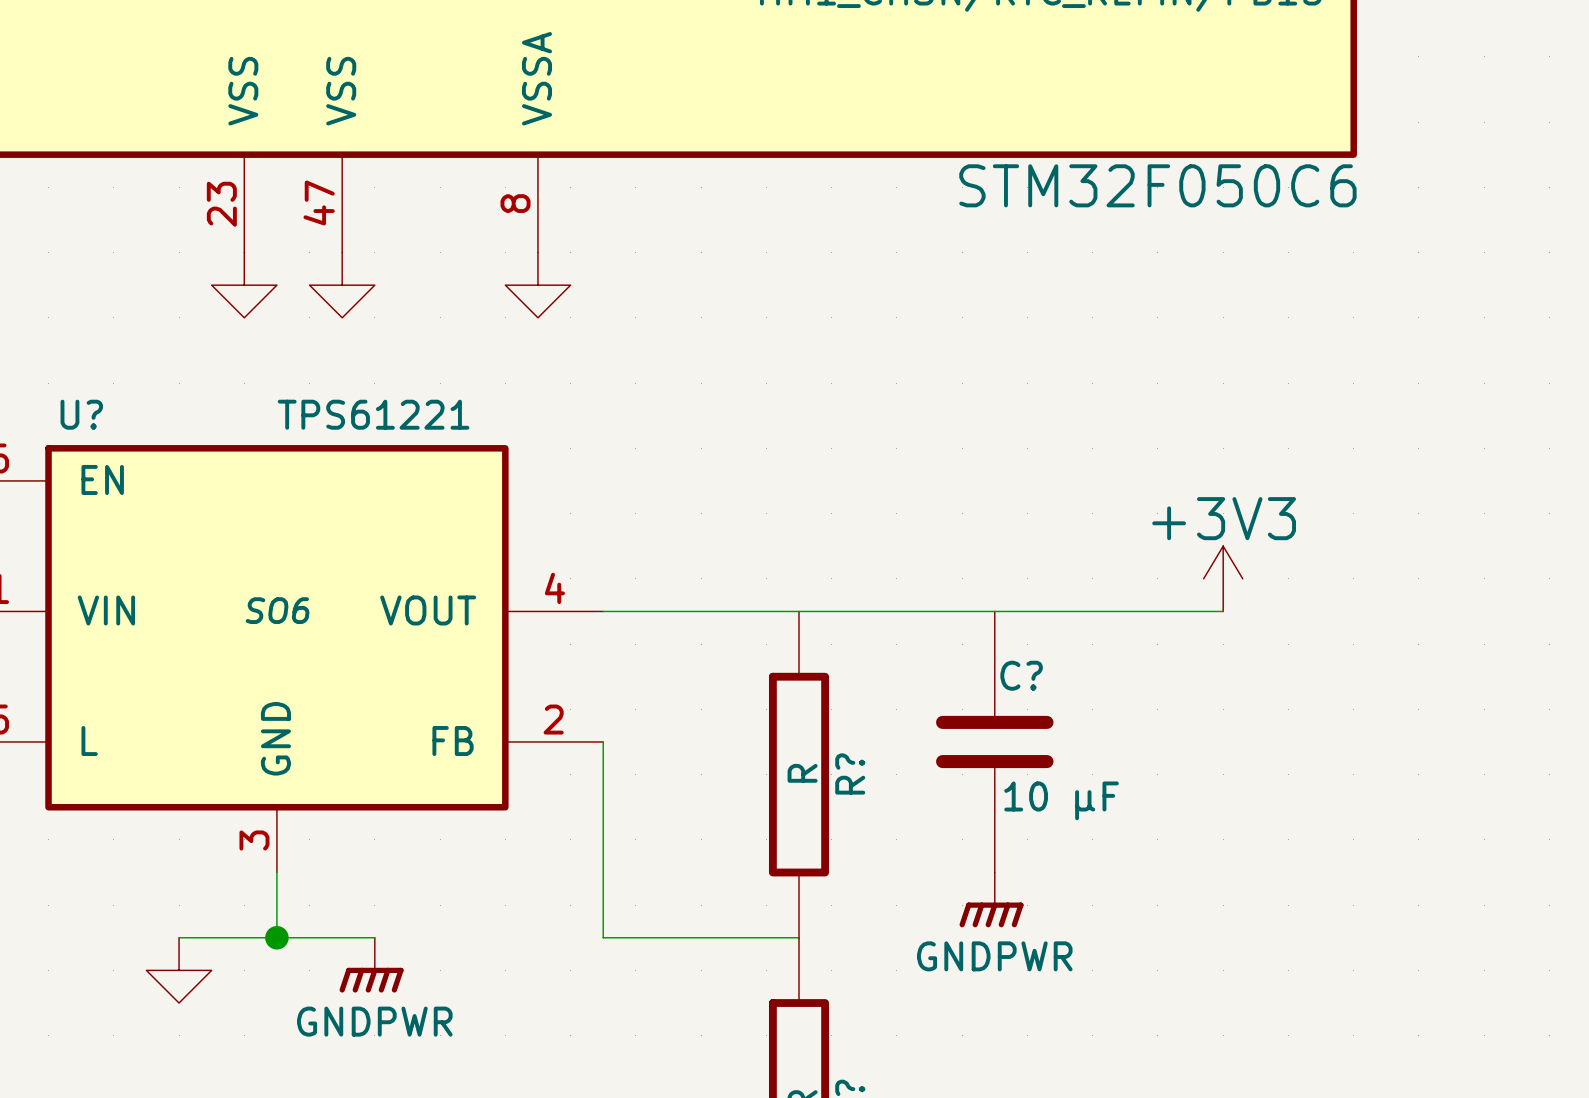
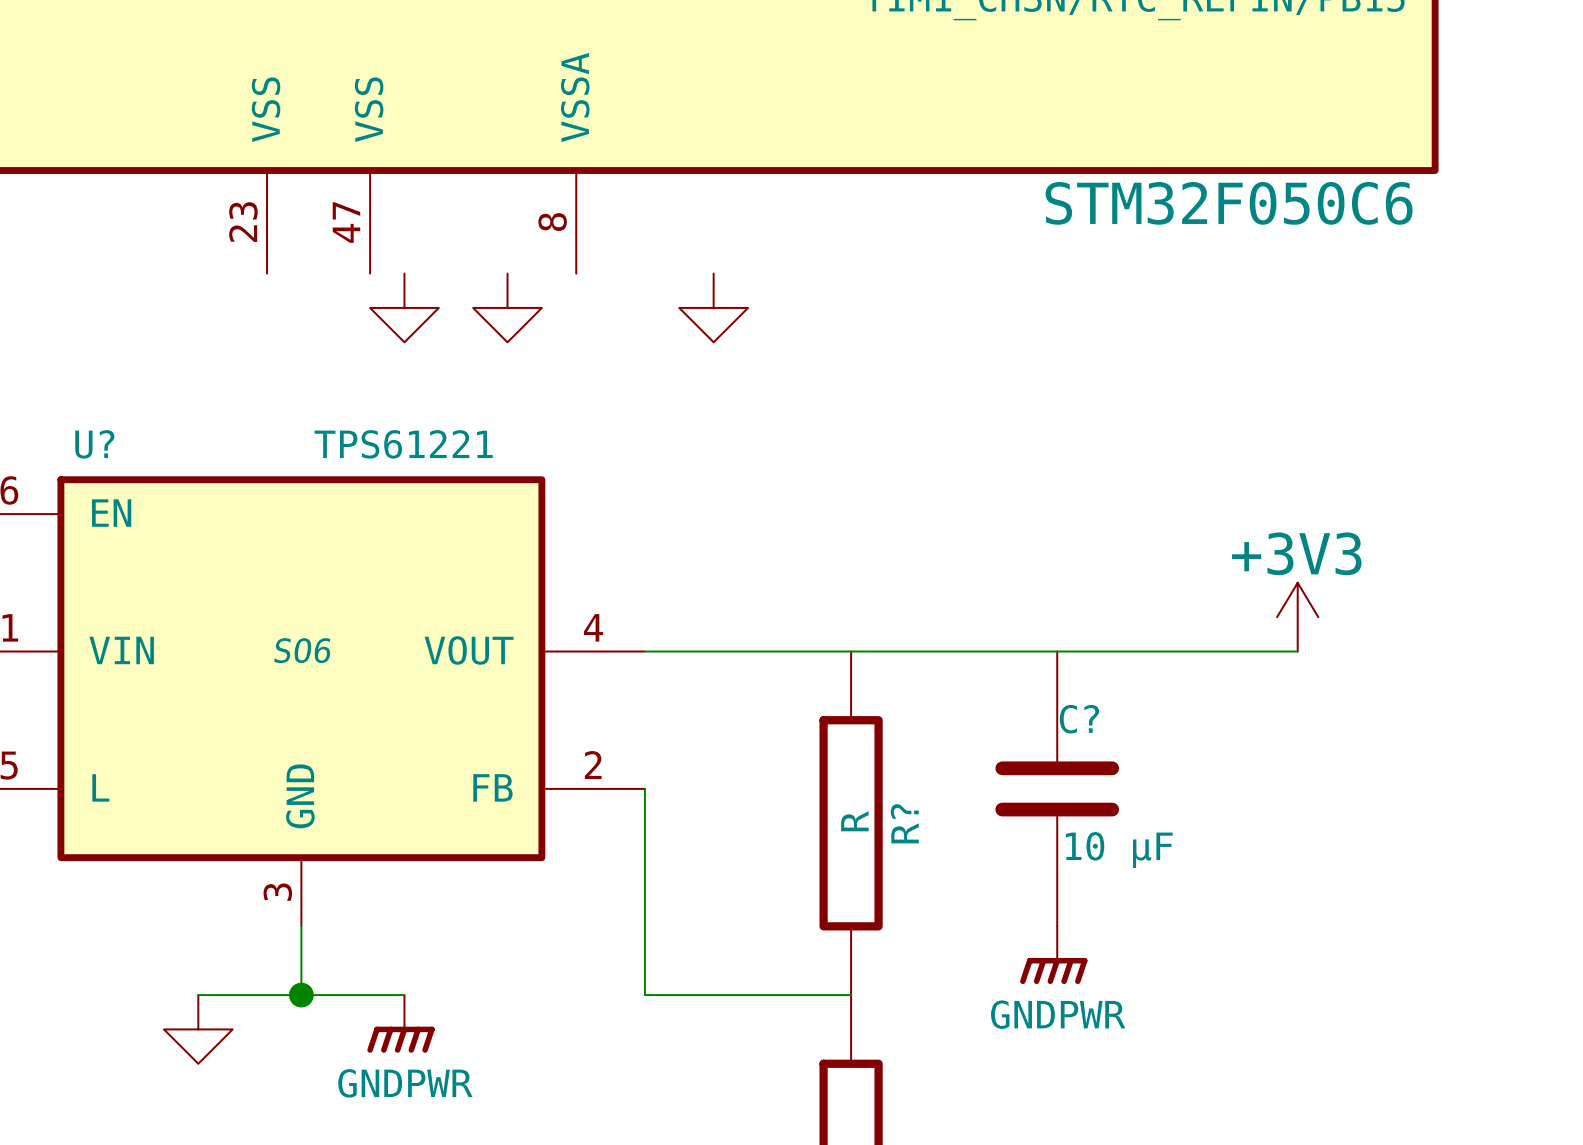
power symbol: (244, 285) -> none
power symbol position: (342, 285) -> (404, 307)
power symbol: none -> (507, 307)
power symbol: (537, 285) -> none
power symbol: none -> (713, 307)

